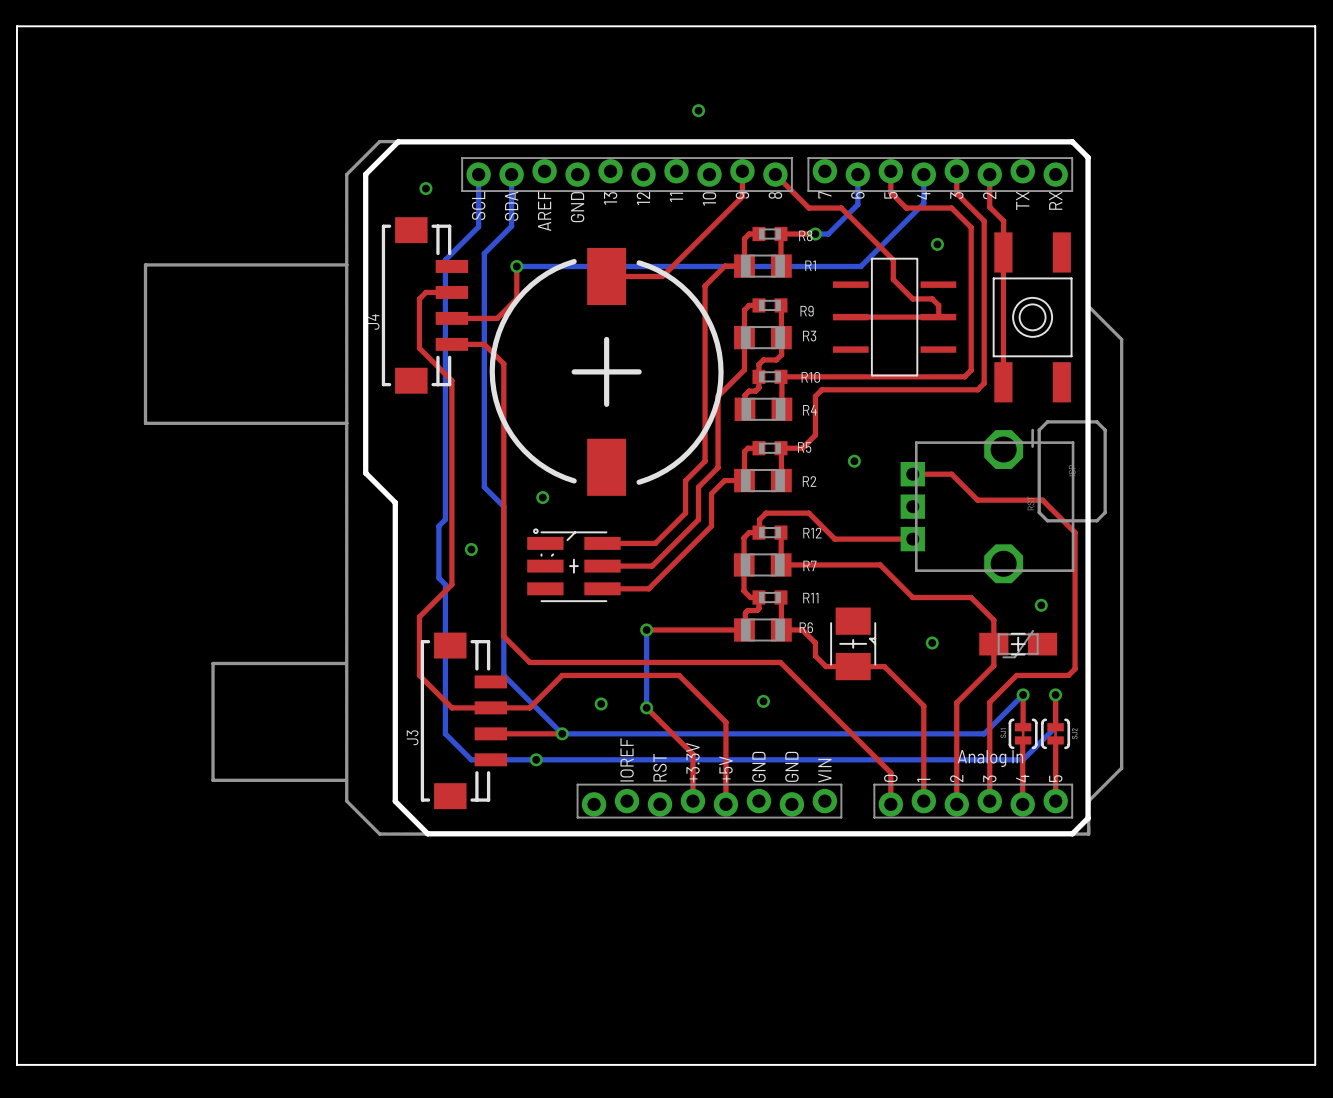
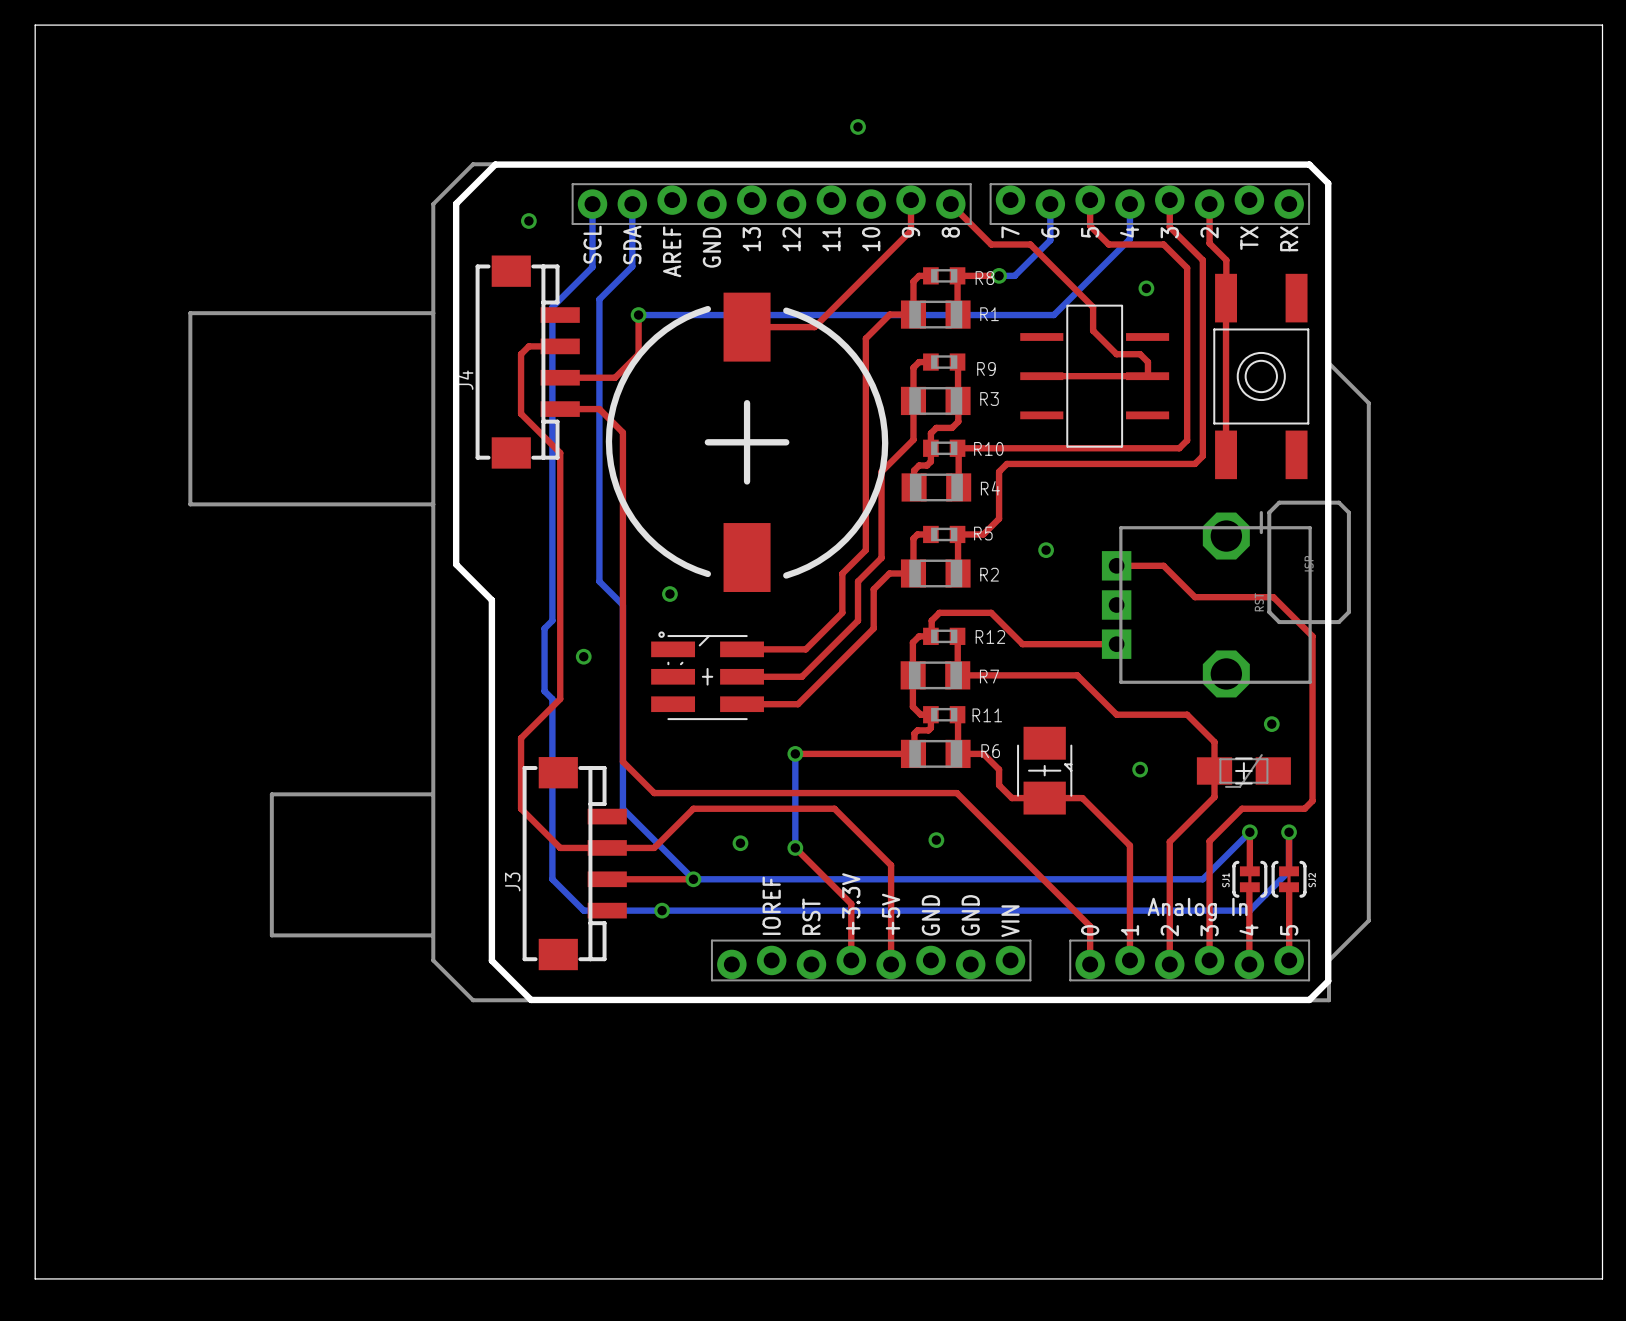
J4 footprint: [381, 217, 469, 394] -> [475, 255, 580, 469]
J3 footprint: [420, 632, 508, 810] -> [522, 757, 627, 971]

